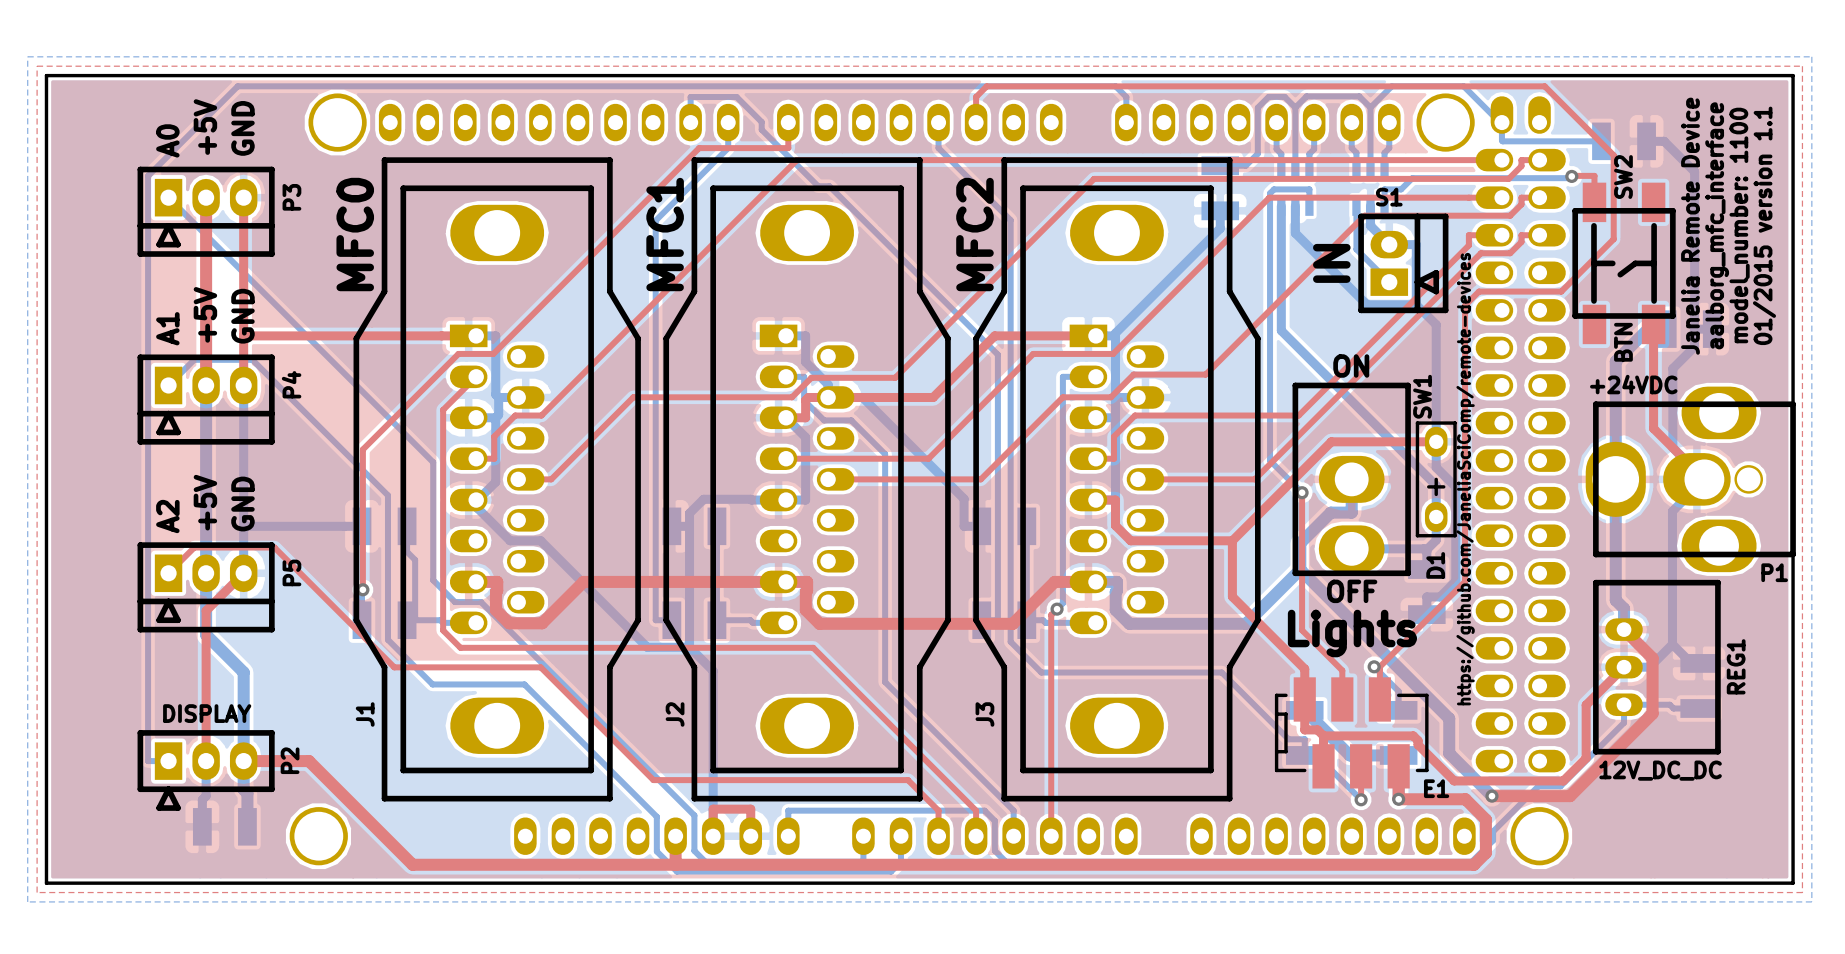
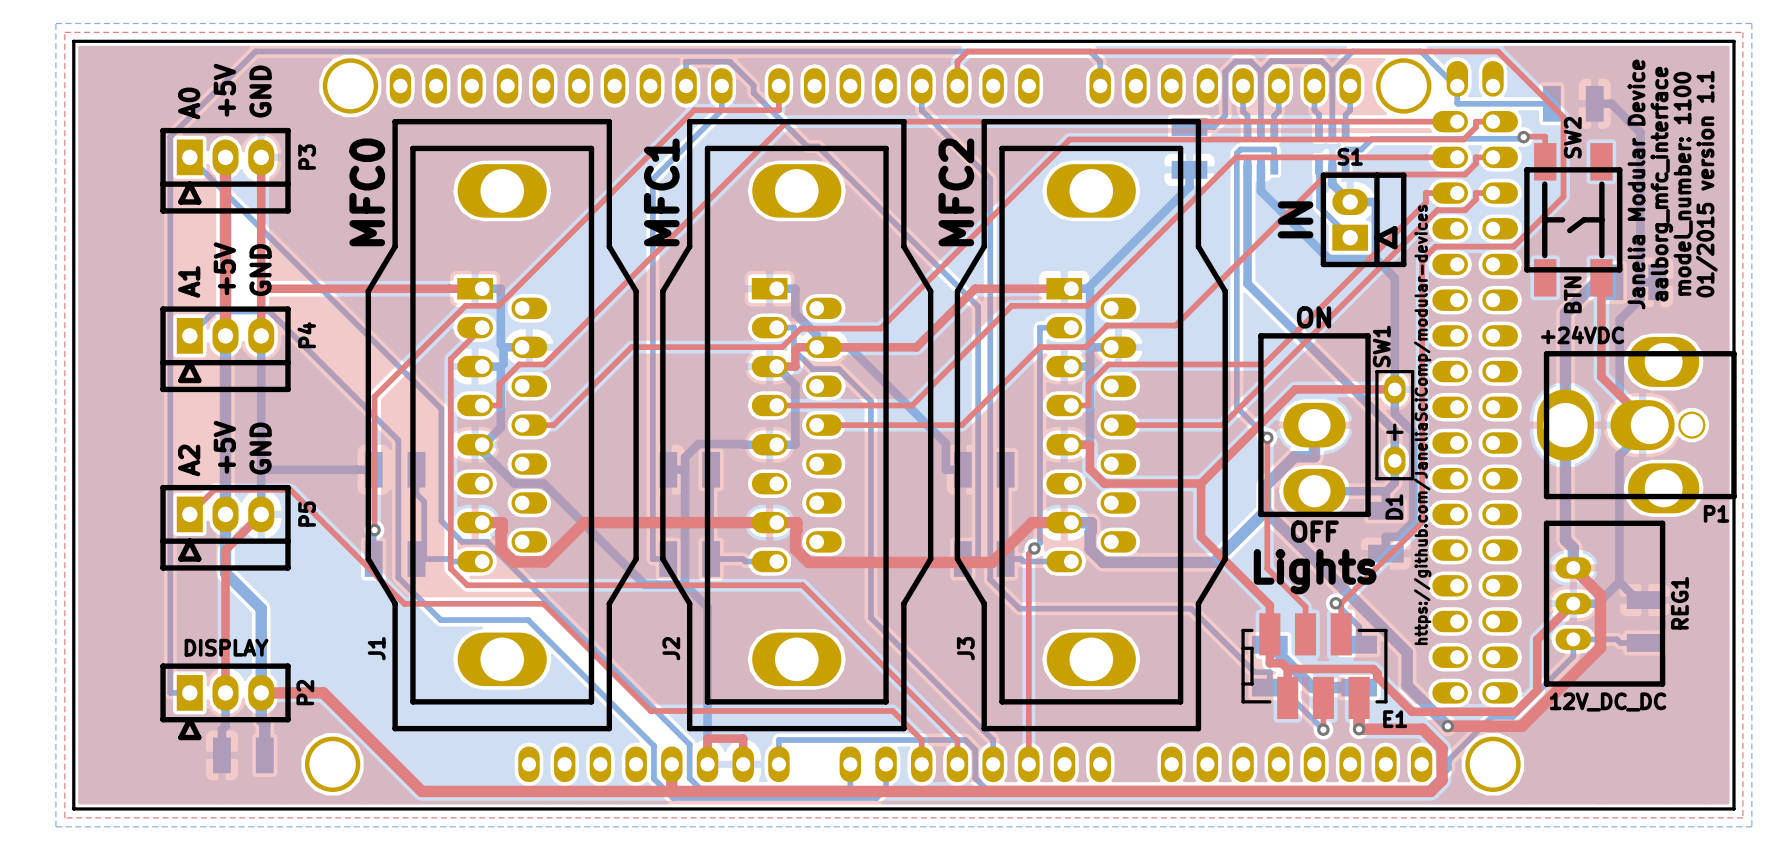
text: Janelia Remote Device (1690, 226) -> Janelia Modular Device (1636, 184)
text: https://github.com/JaneliaSciComp/remote-devices (1465, 479) -> https://github.com/JaneliaSciComp/modular-devices (1422, 424)

